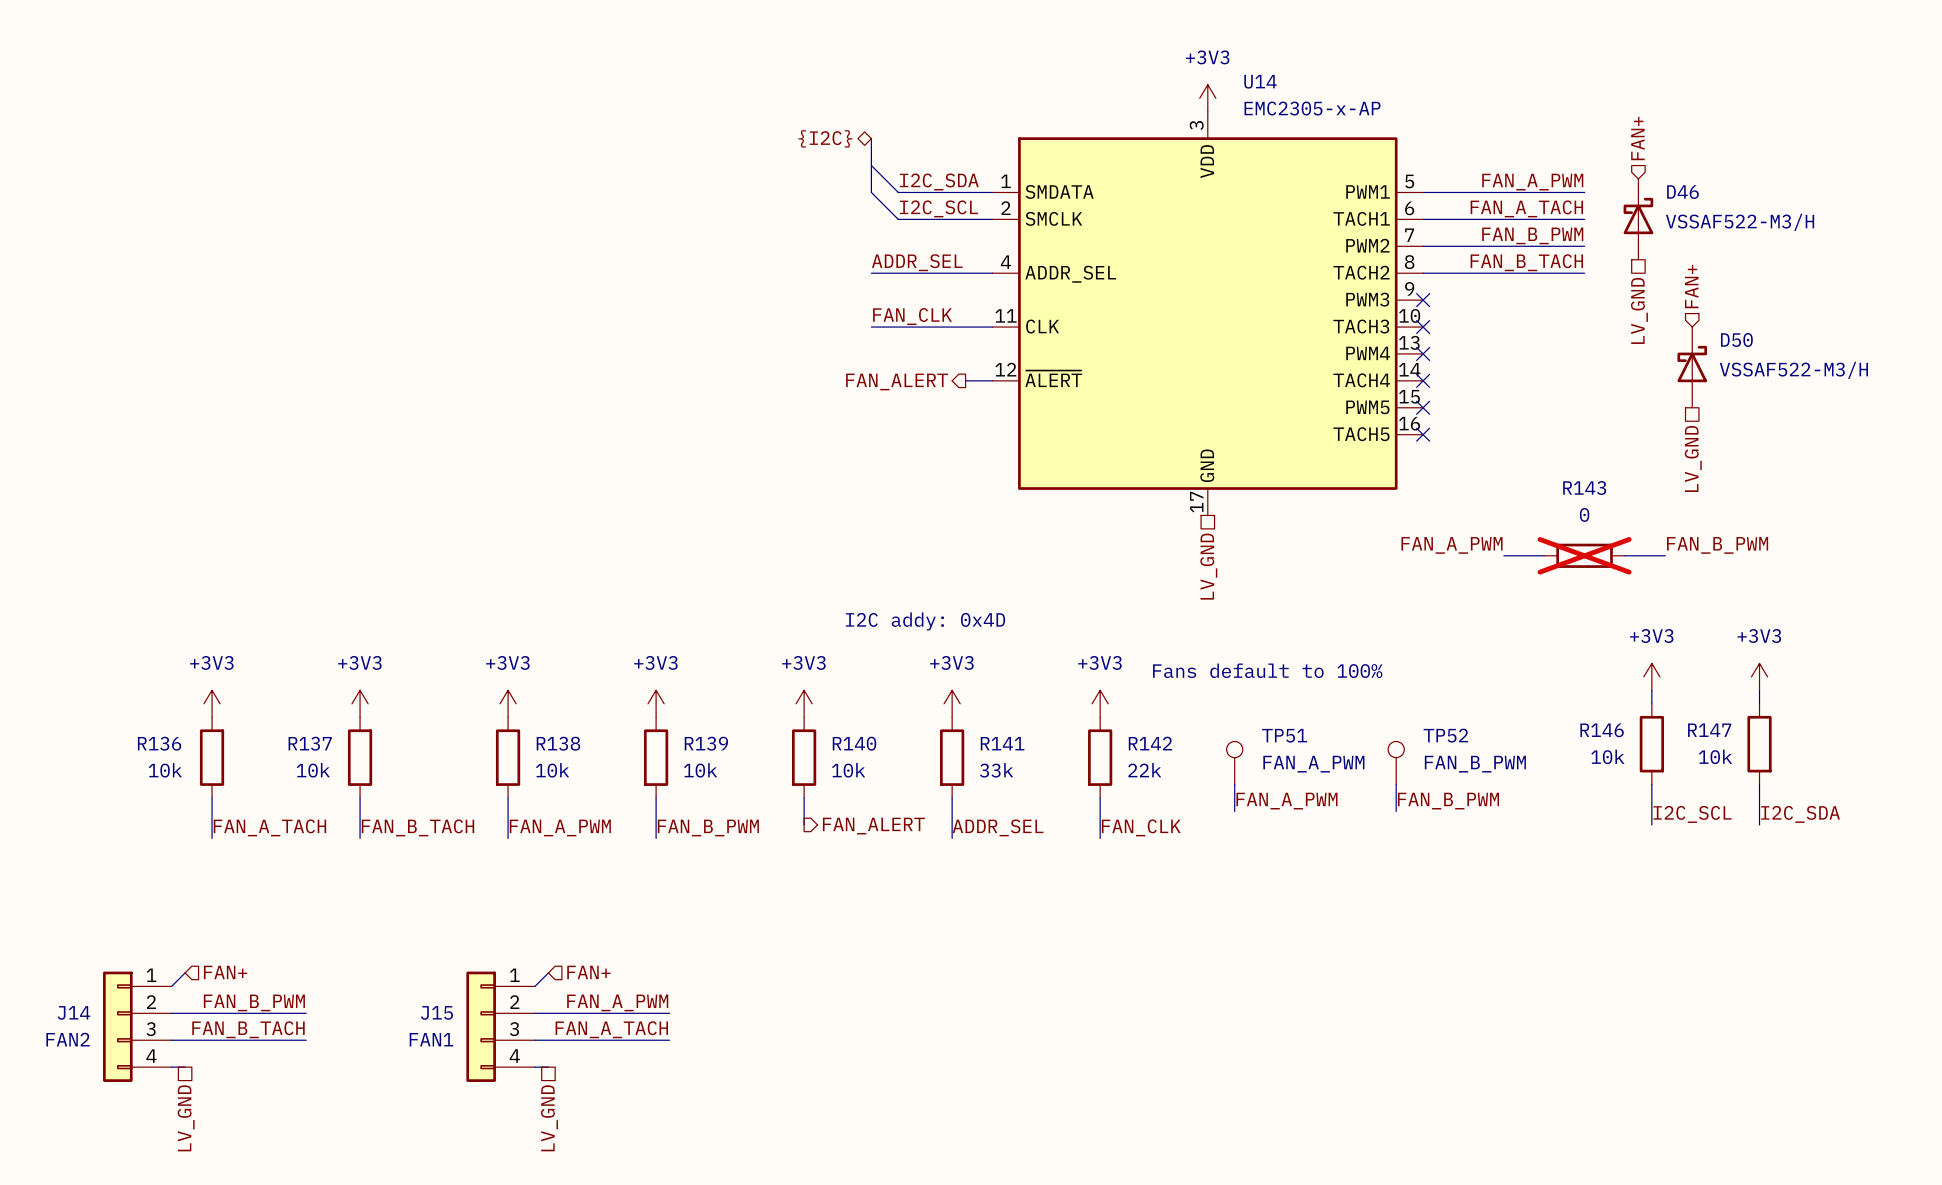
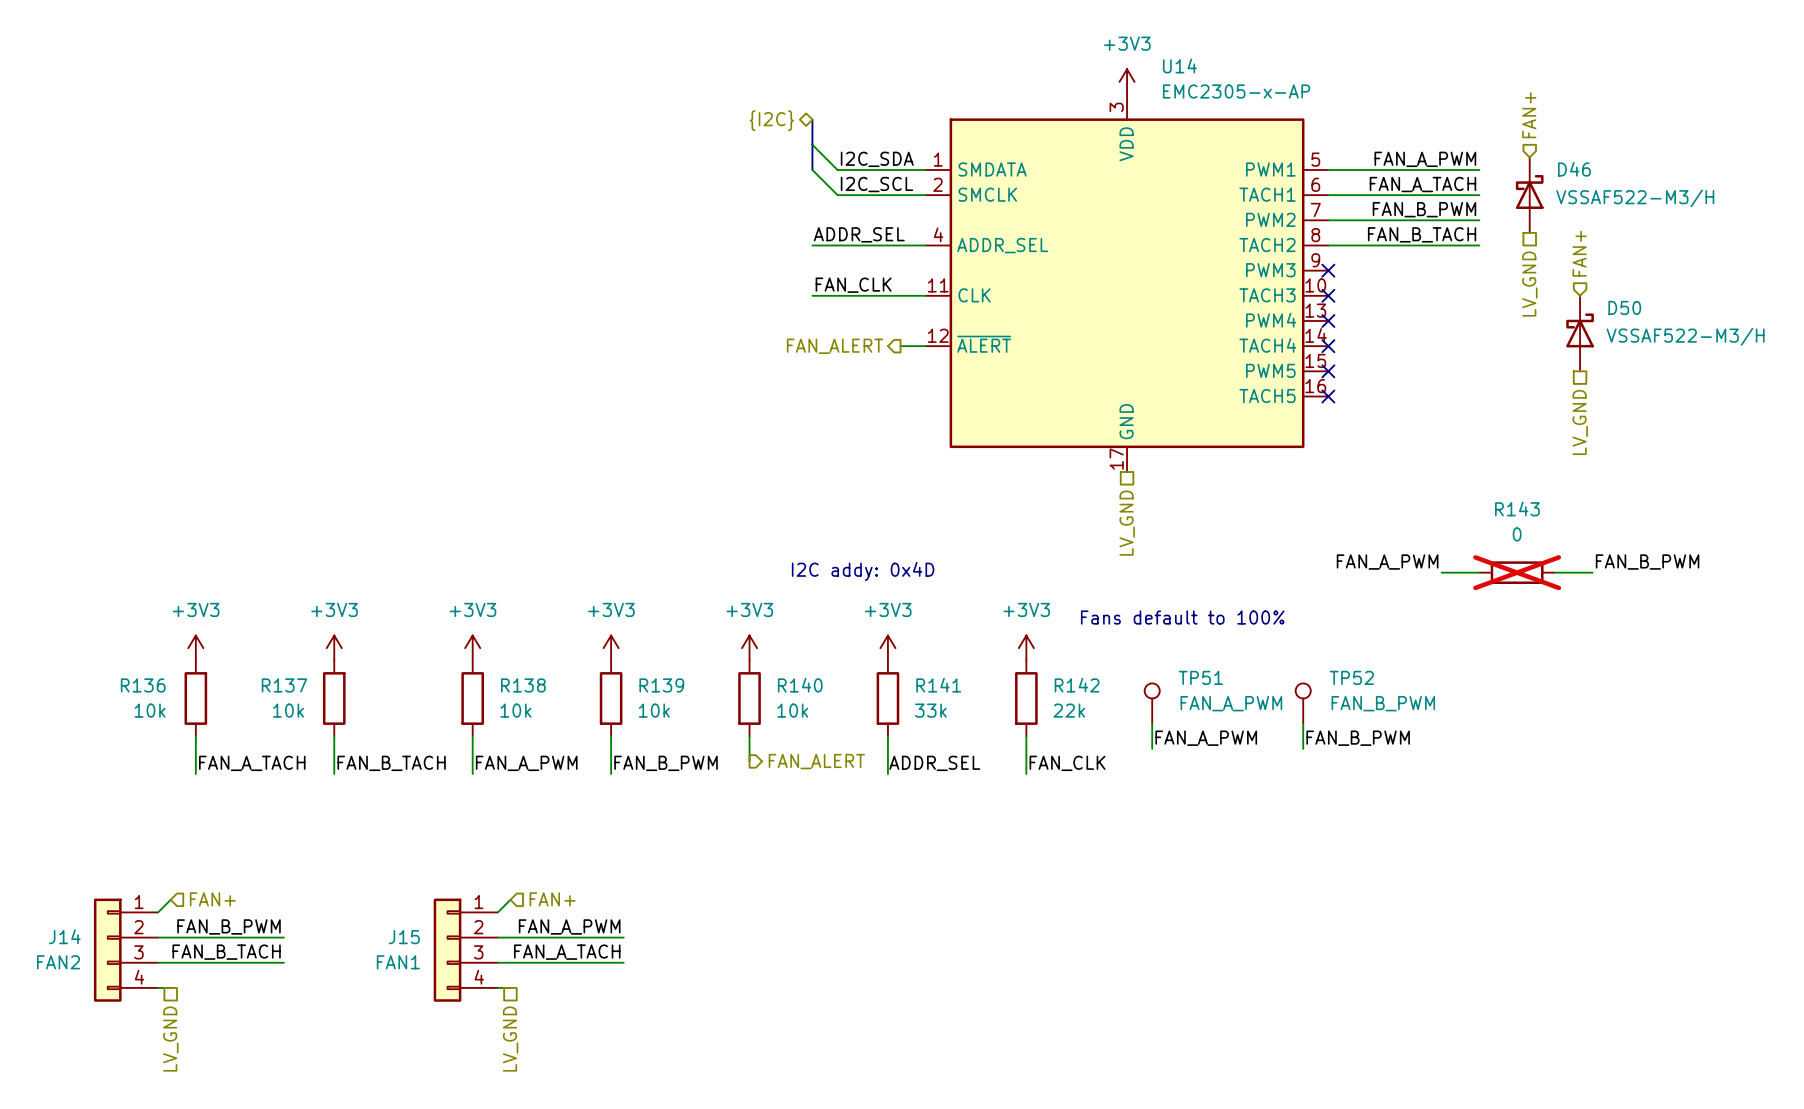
label position: FAN_A_PWM (1452, 545) -> FAN_A_PWM (1387, 562)
label position: FAN_B_PWM (1717, 545) -> FAN_B_PWM (1647, 562)
wire: (1503, 555) (1544, 555) -> (1441, 572) (1479, 572)
R143 position: (1584, 555) -> (1517, 572)
wire: (1624, 555) (1665, 555) -> (1554, 572) (1592, 572)
power symbol: +3V3 (1651, 676) -> none
power symbol: +3V3 (1759, 676) -> none
wire: (1651, 690) (1651, 703) -> none
wire: (1759, 690) (1759, 703) -> none
R146: 10k (1651, 744) -> none
R147: 10k (1759, 744) -> none
wire: (1651, 784) (1651, 824) -> none
wire: (1759, 784) (1759, 824) -> none
label: I2C_SCL (1692, 814) -> none
label: I2C_SDA (1800, 814) -> none

